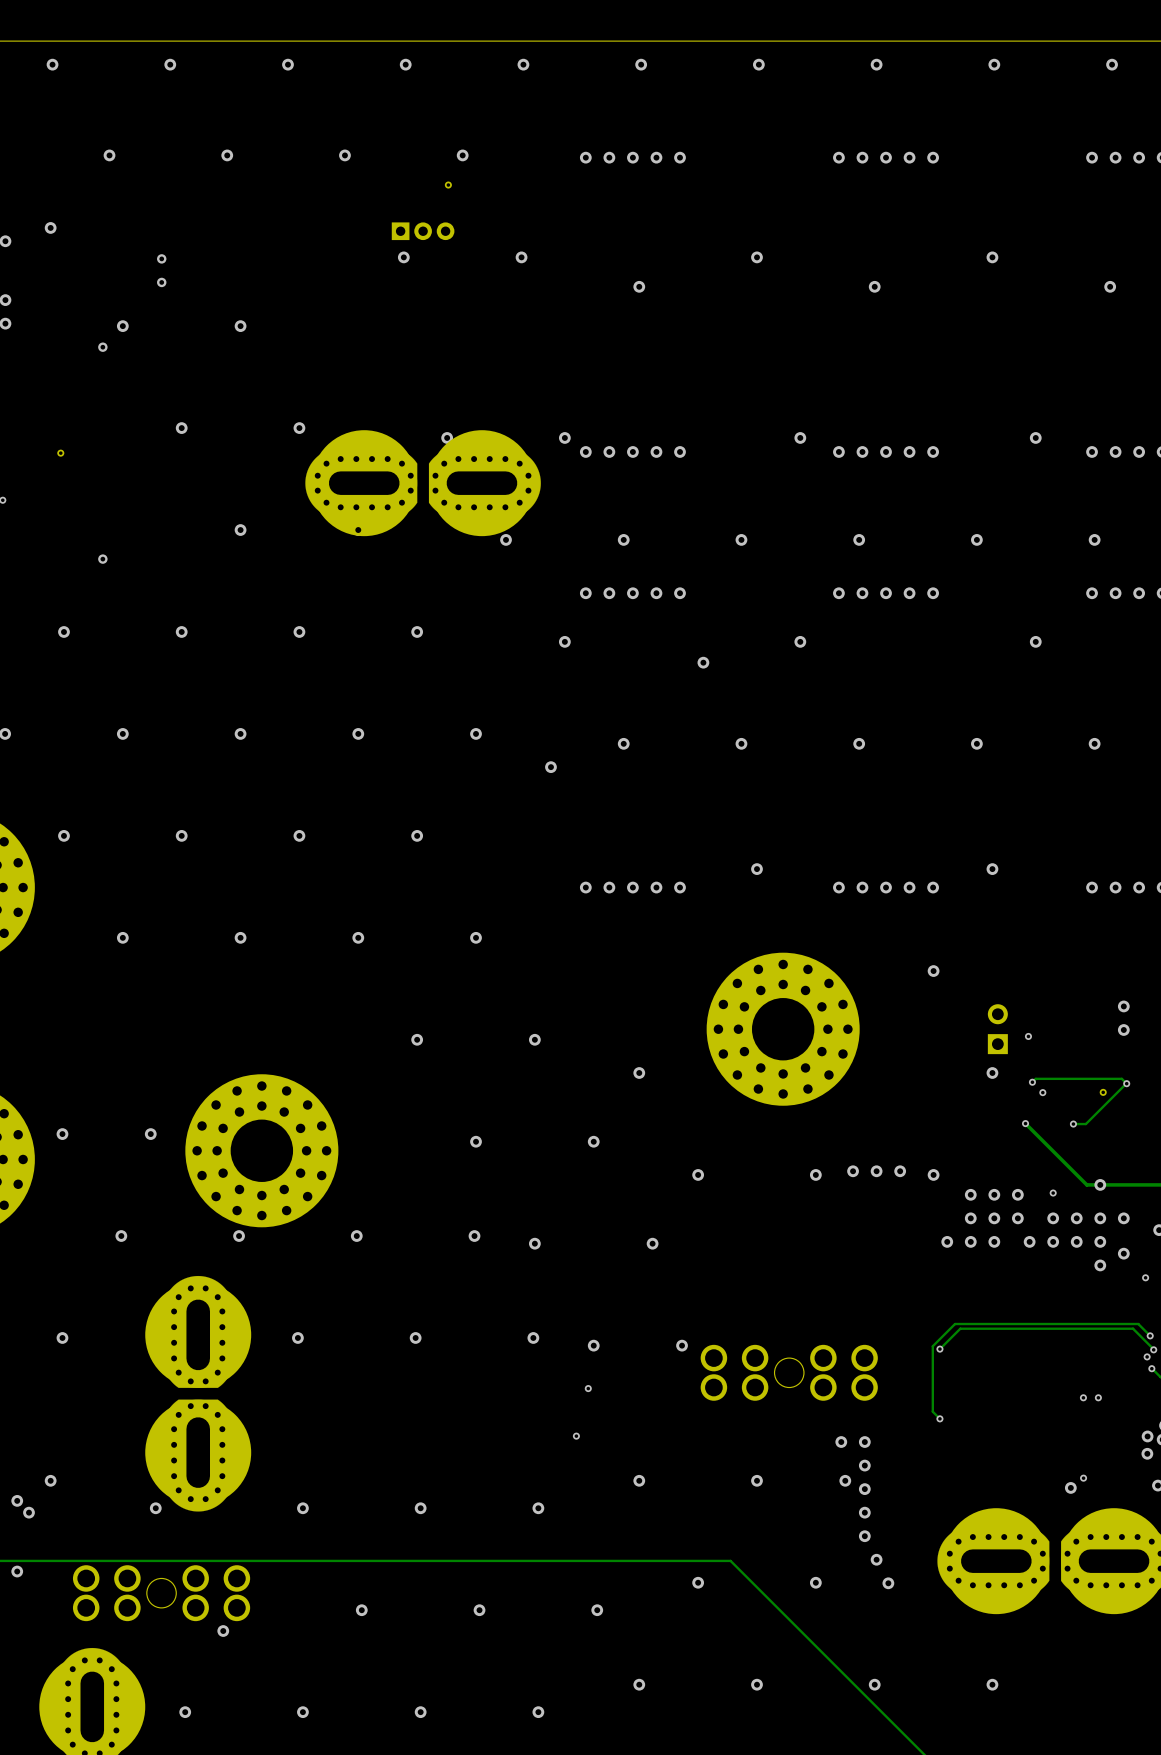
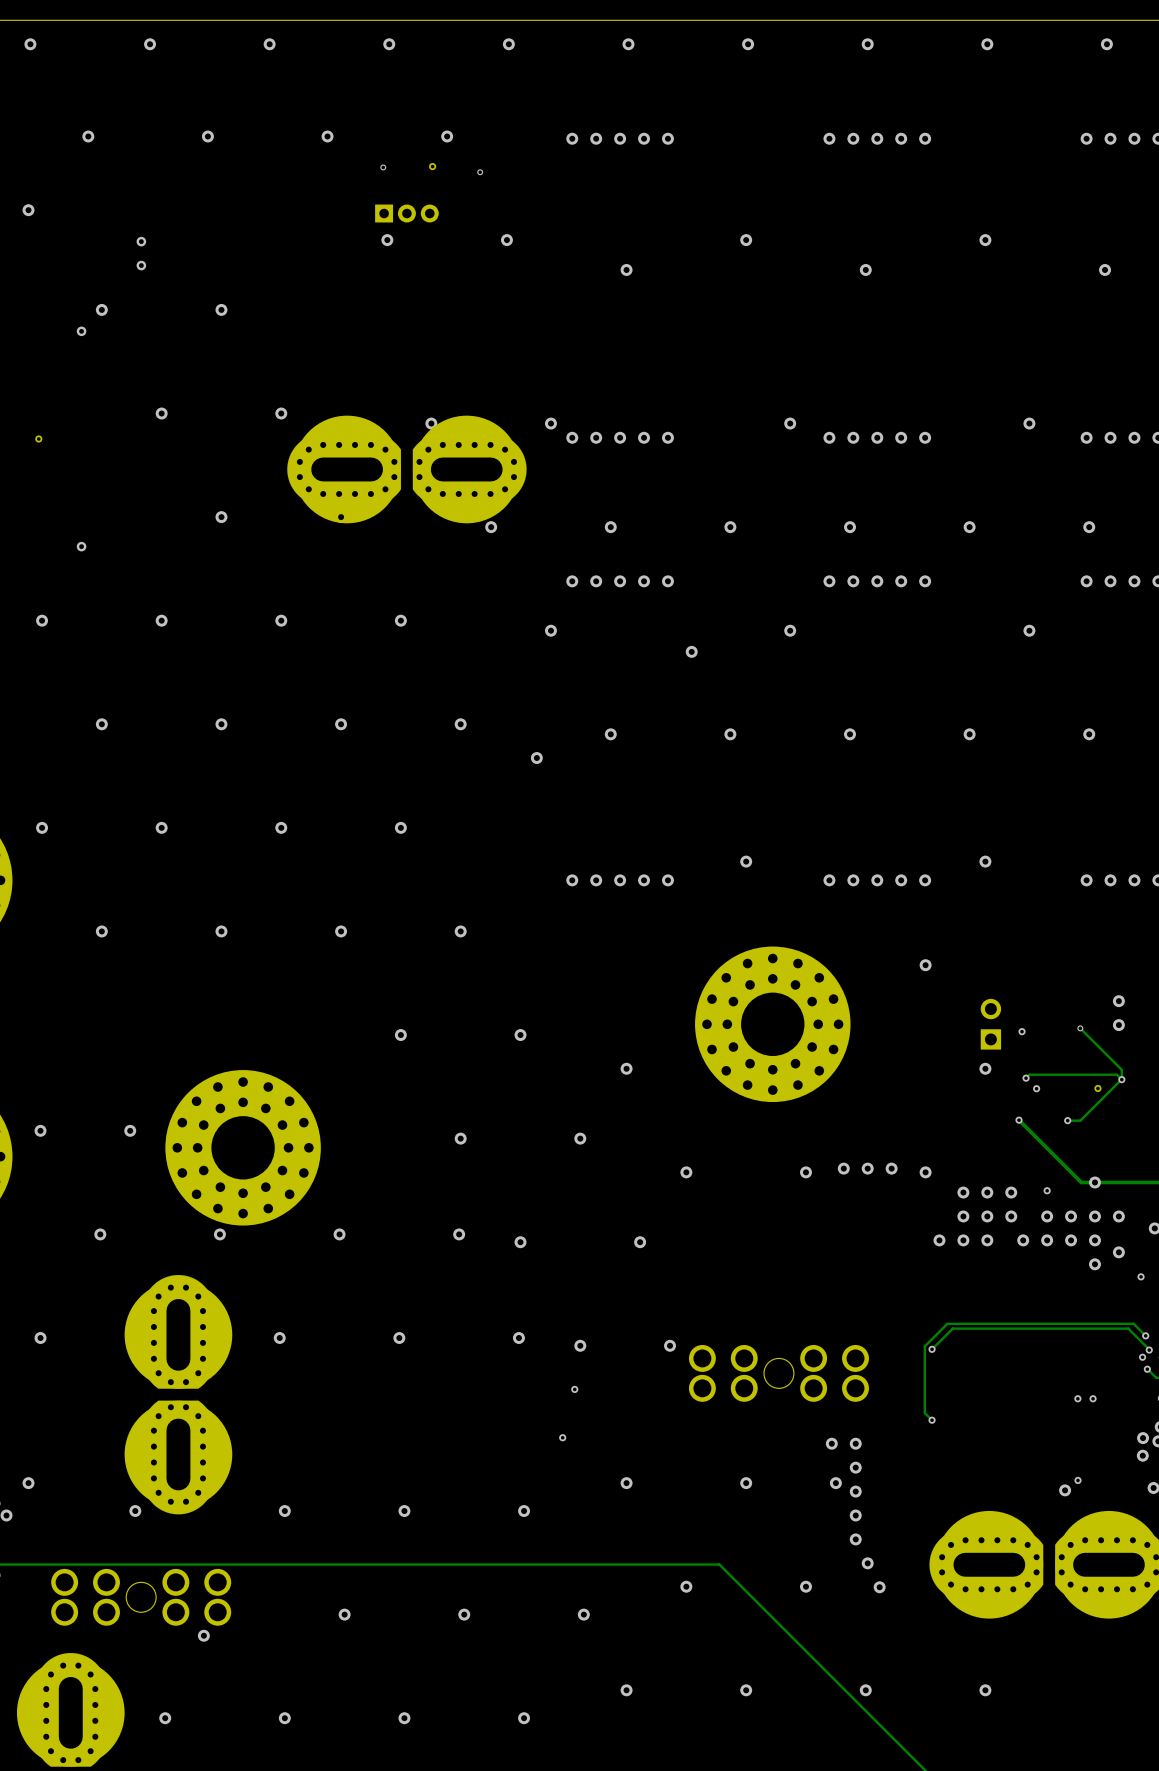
via: none -> (383, 167)
via: none -> (480, 172)
track: none -> (1080, 1028) (1121, 1069) (1121, 1079)
via: none -> (1080, 1028)

